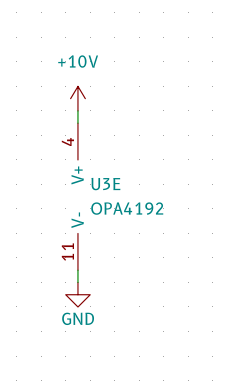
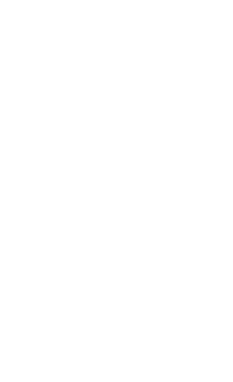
power symbol: +10V (77, 98) -> none
wire: (77, 110) (77, 123) -> none
U3E: OPA4192 (77, 196) -> none
wire: (77, 270) (77, 282) -> none
power symbol: GND (77, 294) -> none

